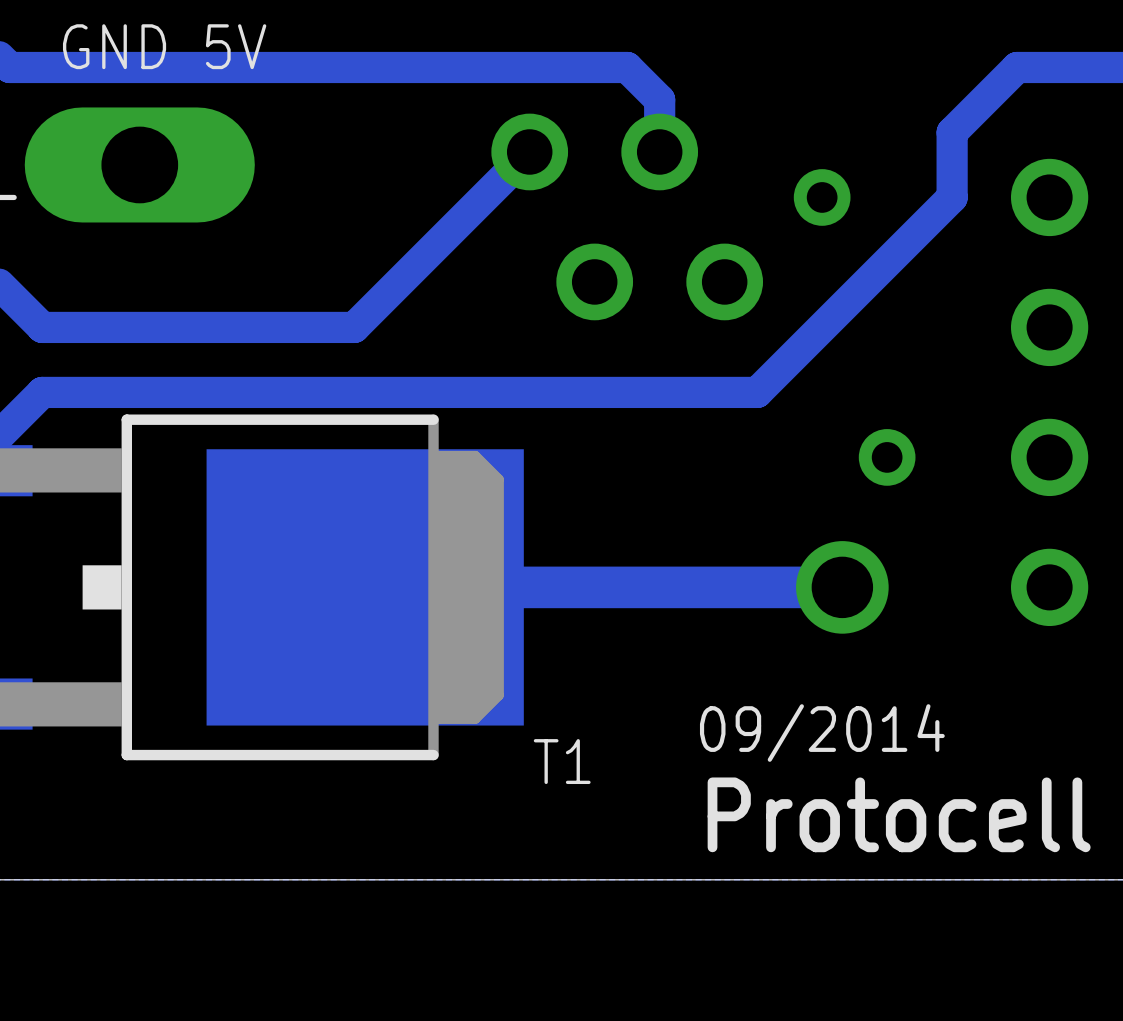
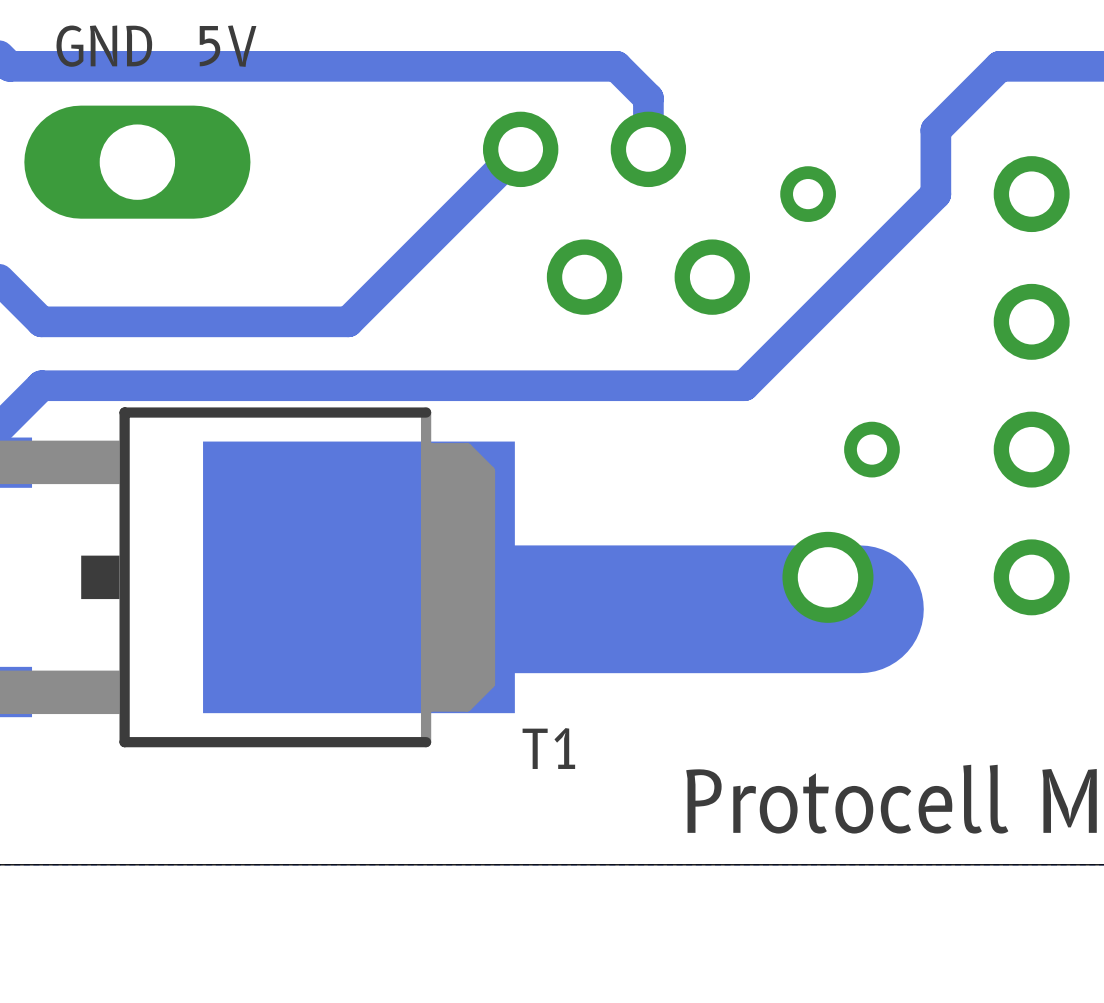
track: (842, 587) (365, 587) -> (859, 609) (360, 609) (358, 607) (358, 577)
text: 09/2014 (822, 733) -> none

